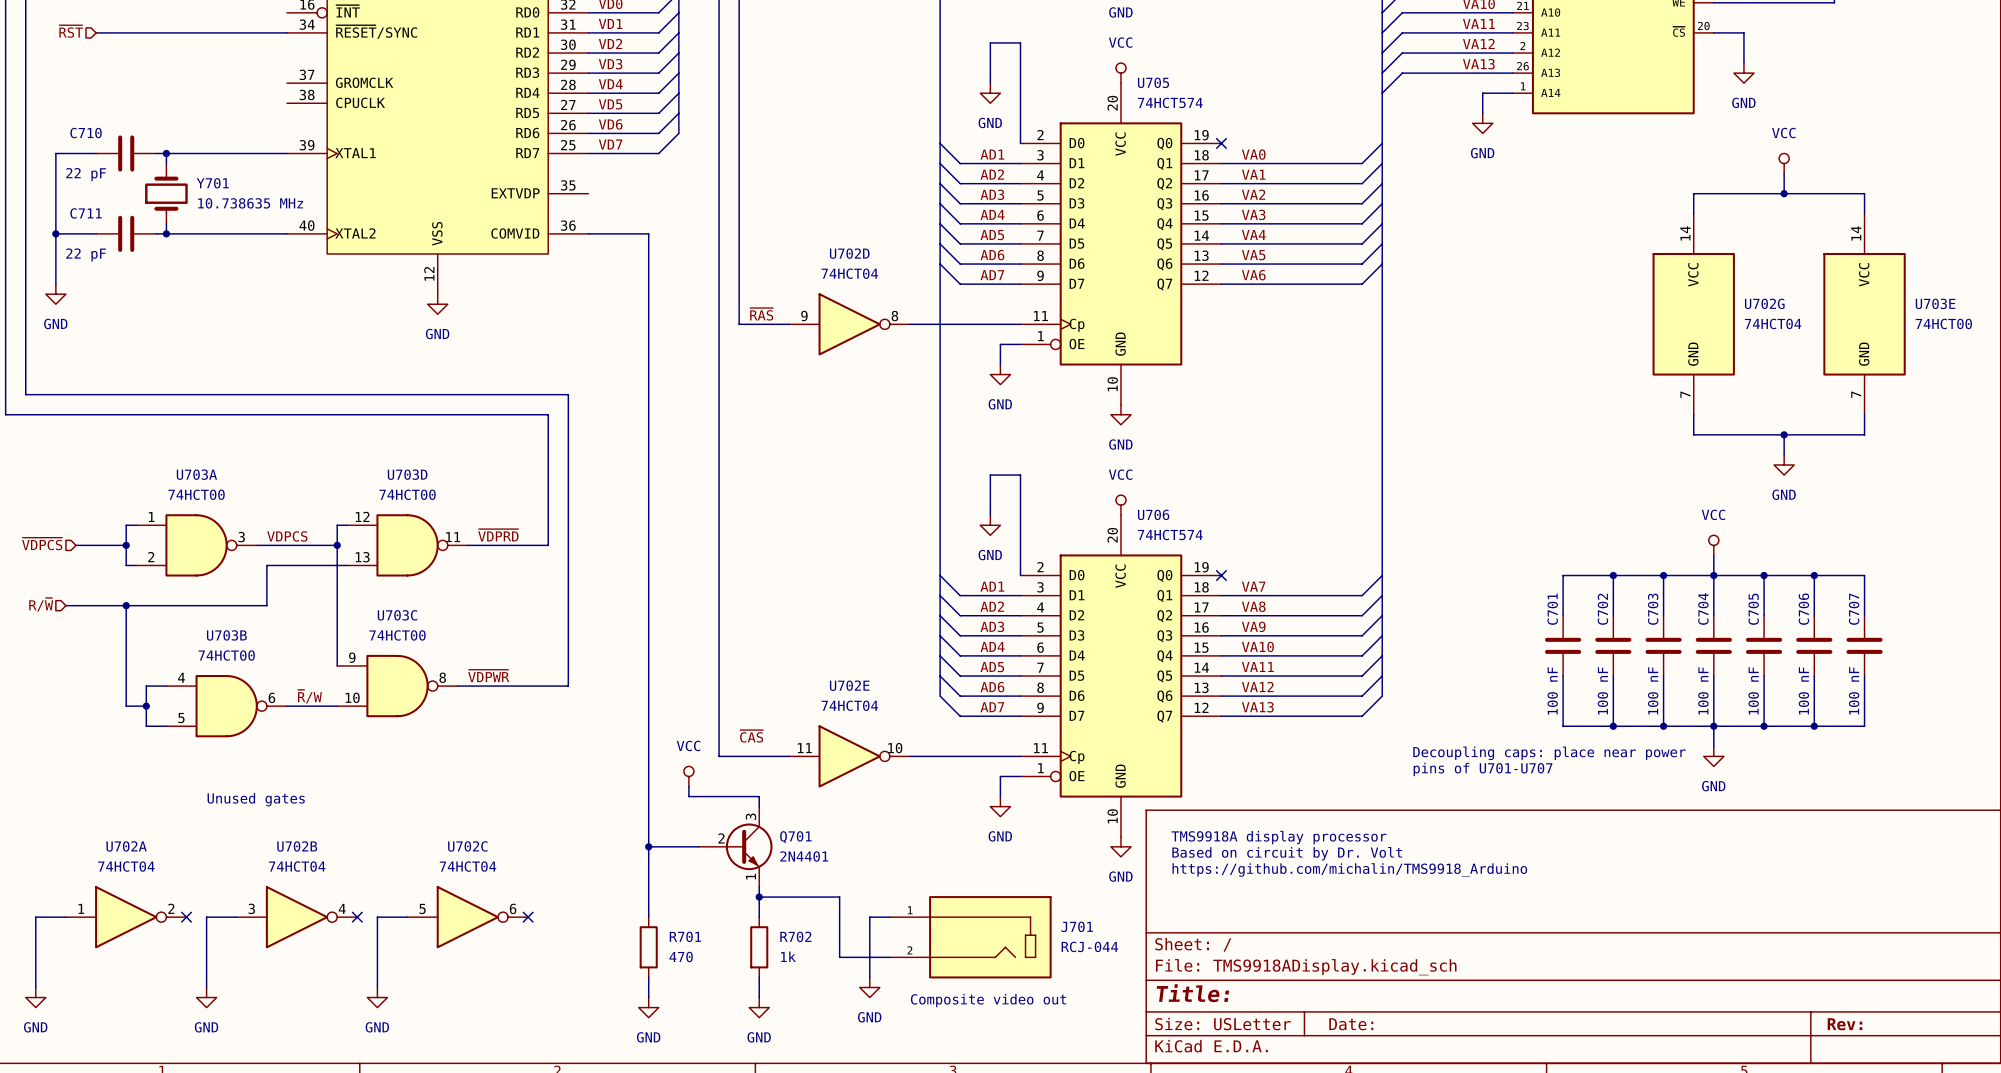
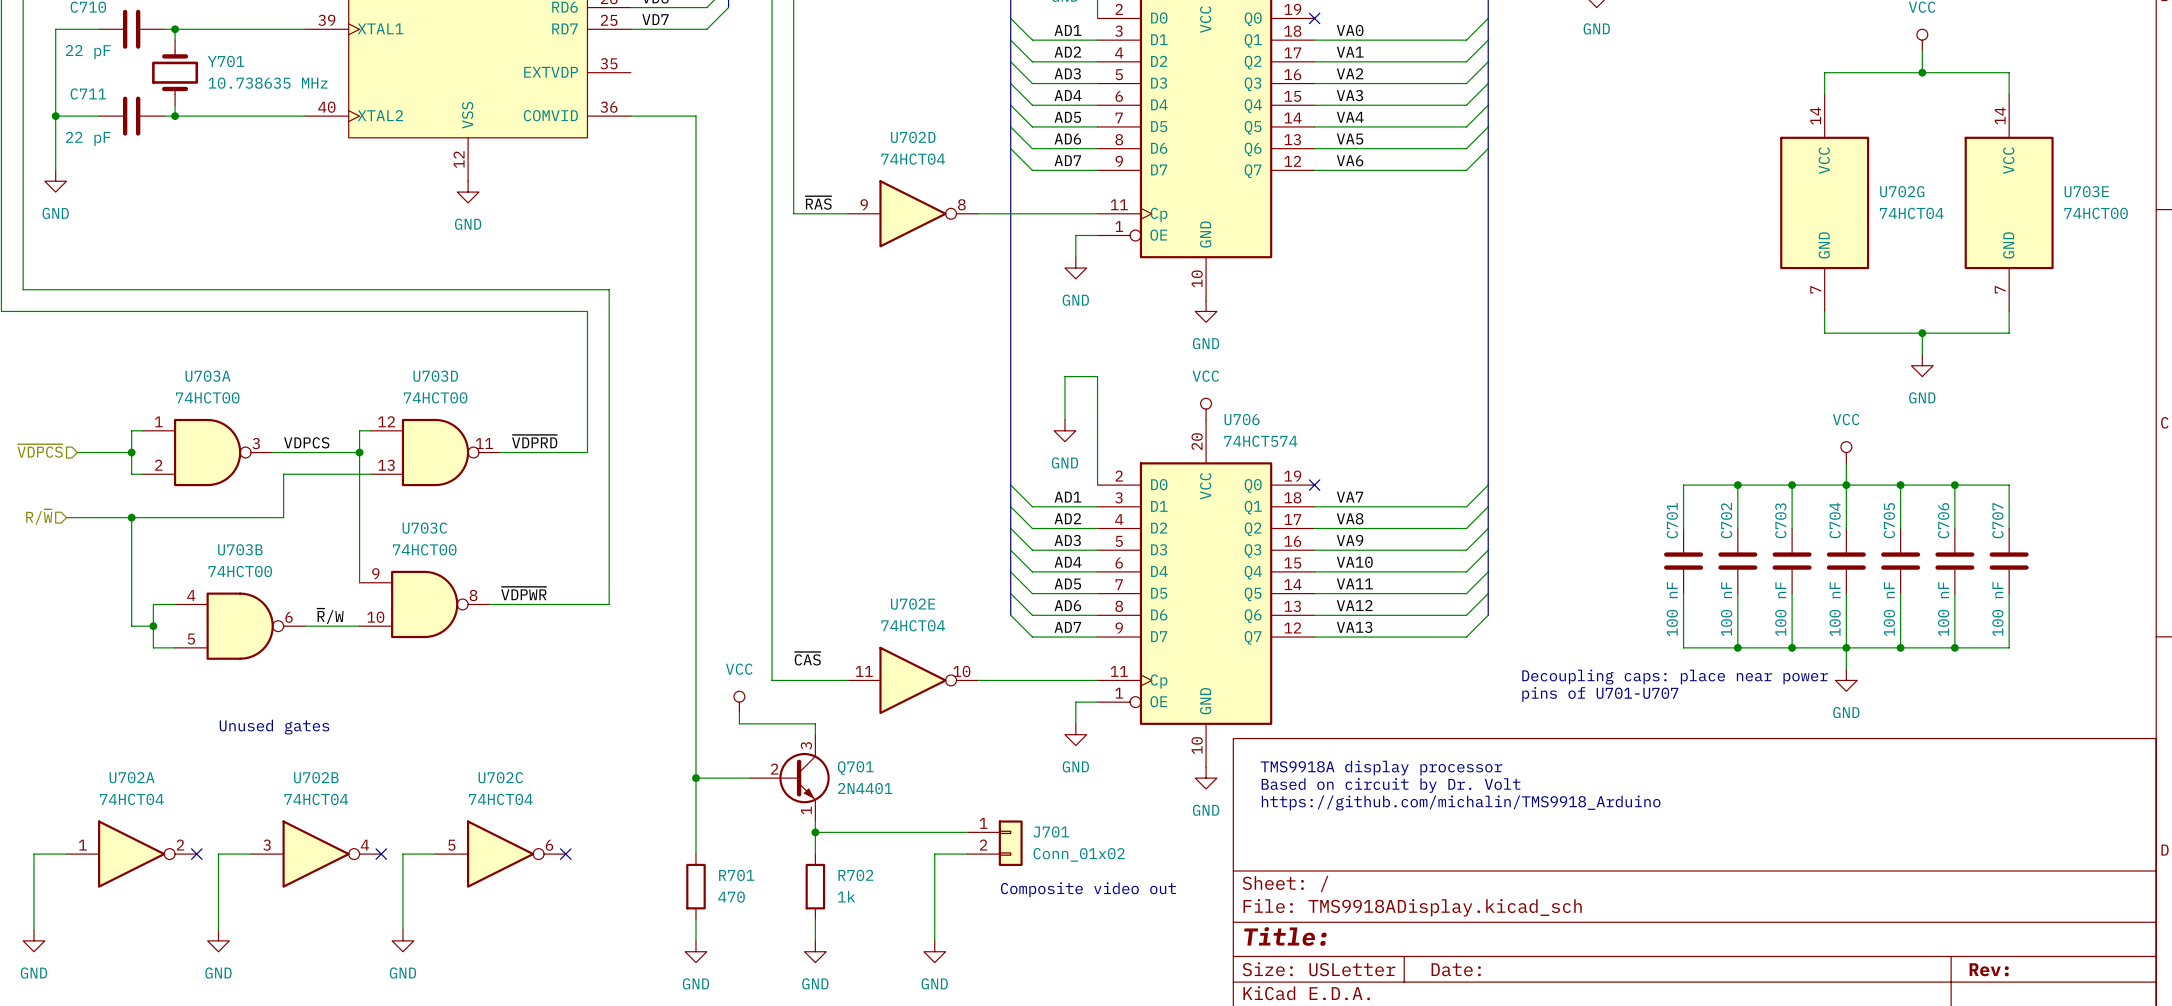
J701 symbol: [889, 896, 1052, 979] -> [967, 820, 1023, 867]
wire: (839, 897) (839, 957) (889, 957) -> (902, 832) (967, 832)
J701 name position: J701 (1077, 926) -> J701 (1051, 831)
J701 value: RCJ-044 (1089, 946) -> Conn_01x02 (1079, 854)
power symbol position: GND (869, 987) -> GND (934, 951)
text position: Composite video out (988, 1000) -> Composite video out (1088, 889)

